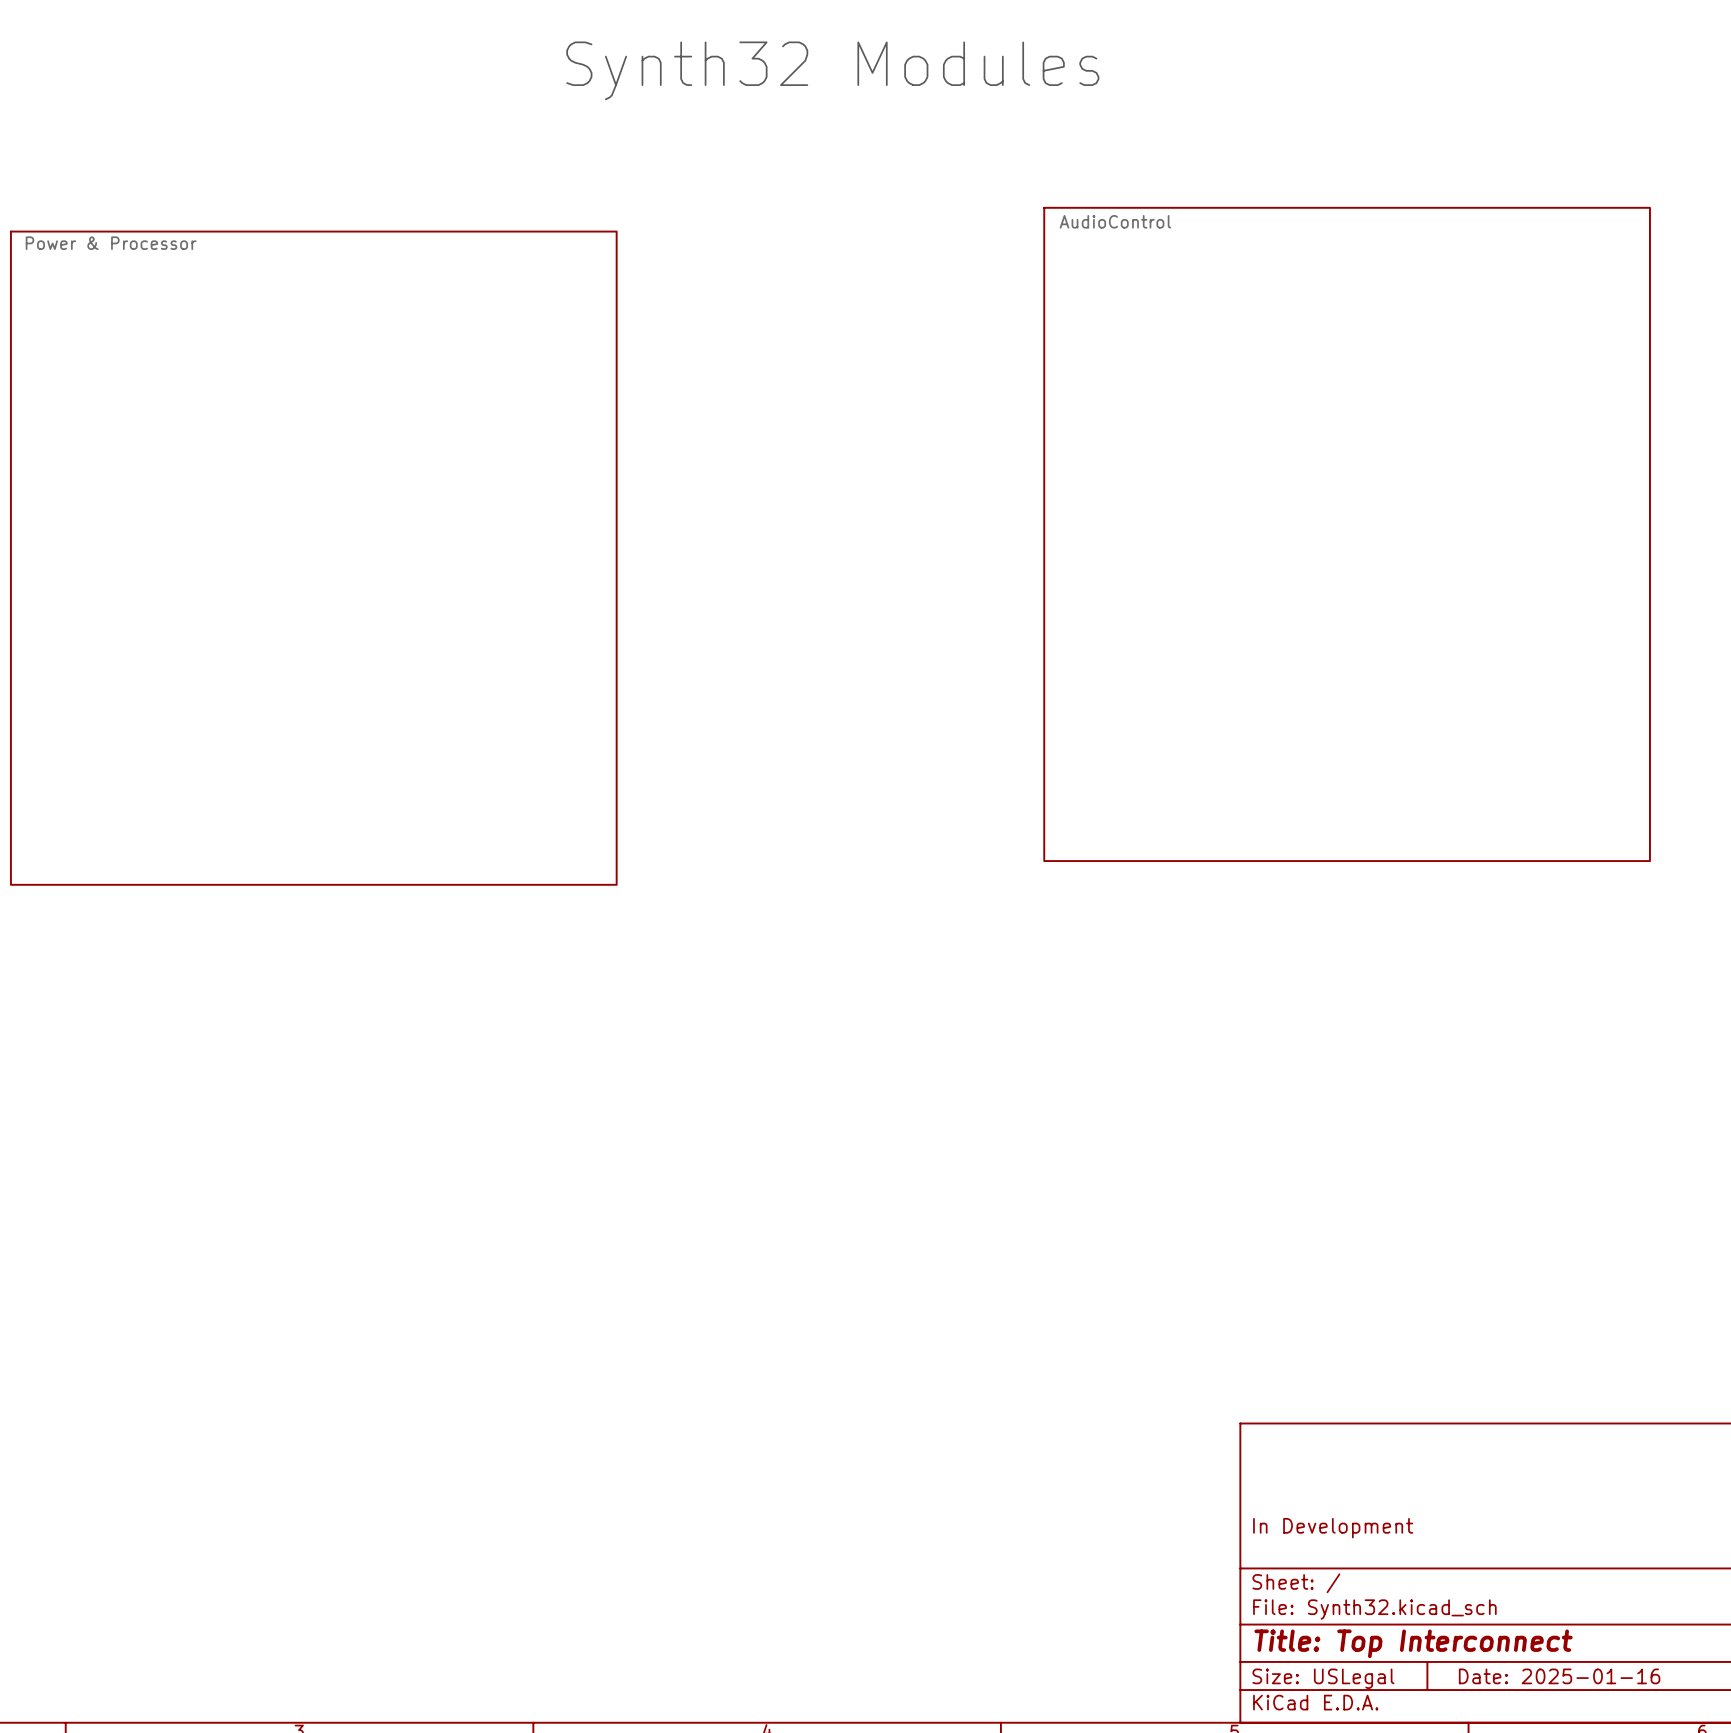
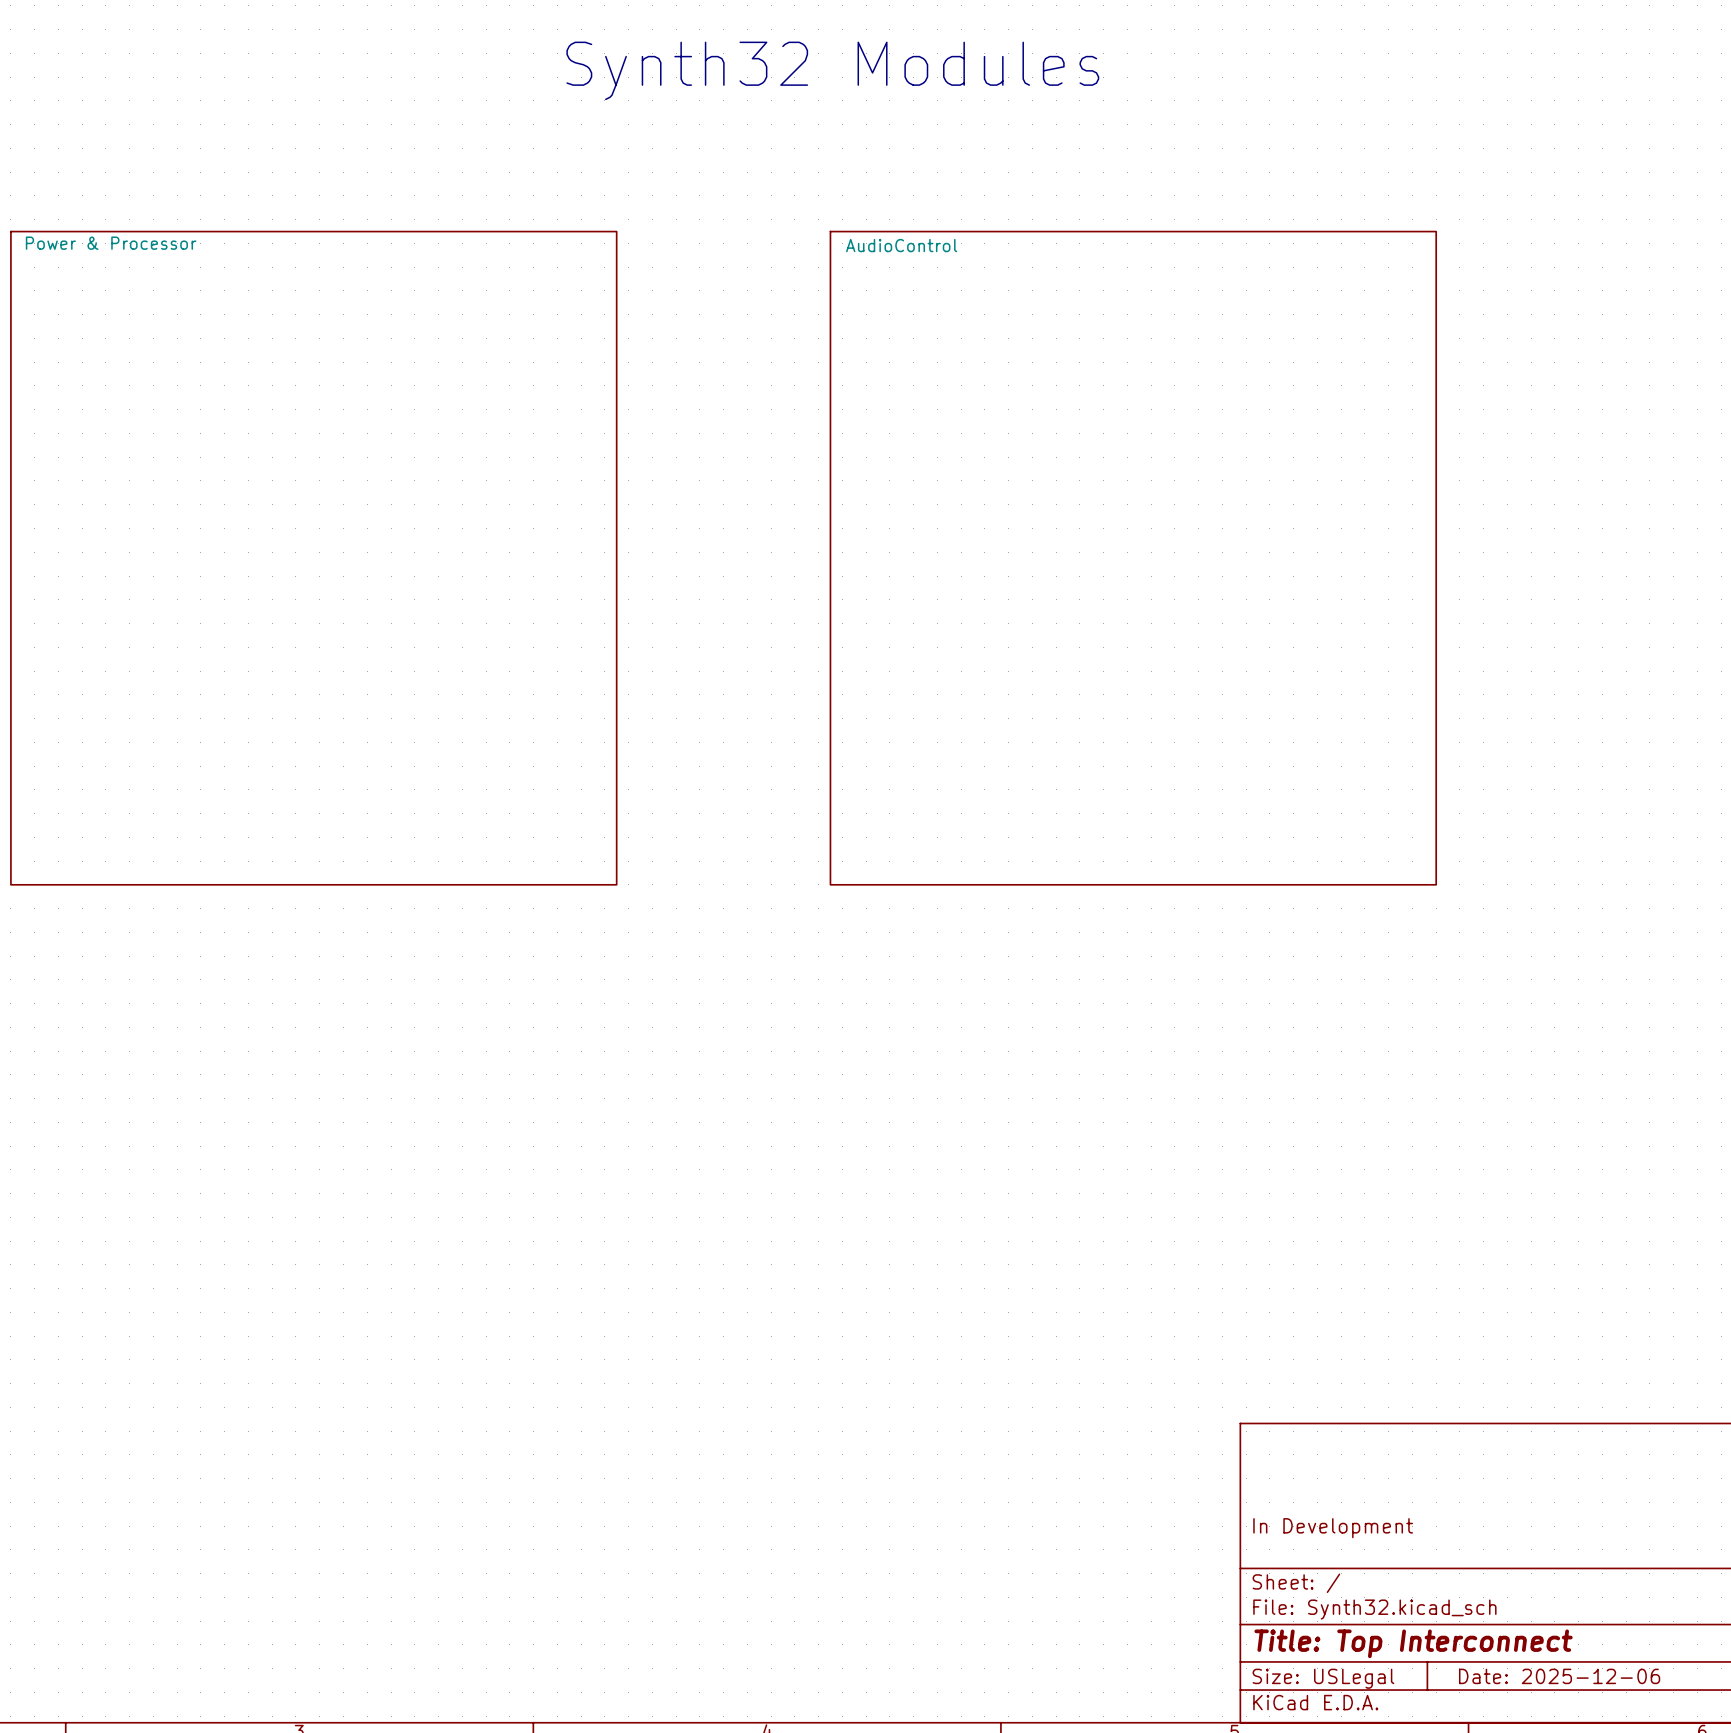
sheet AudioControl position: (1347, 534) -> (1133, 558)
title block: Date: 2025-01-16 (1559, 1676) -> Date: 2025-12-06 (1559, 1676)

